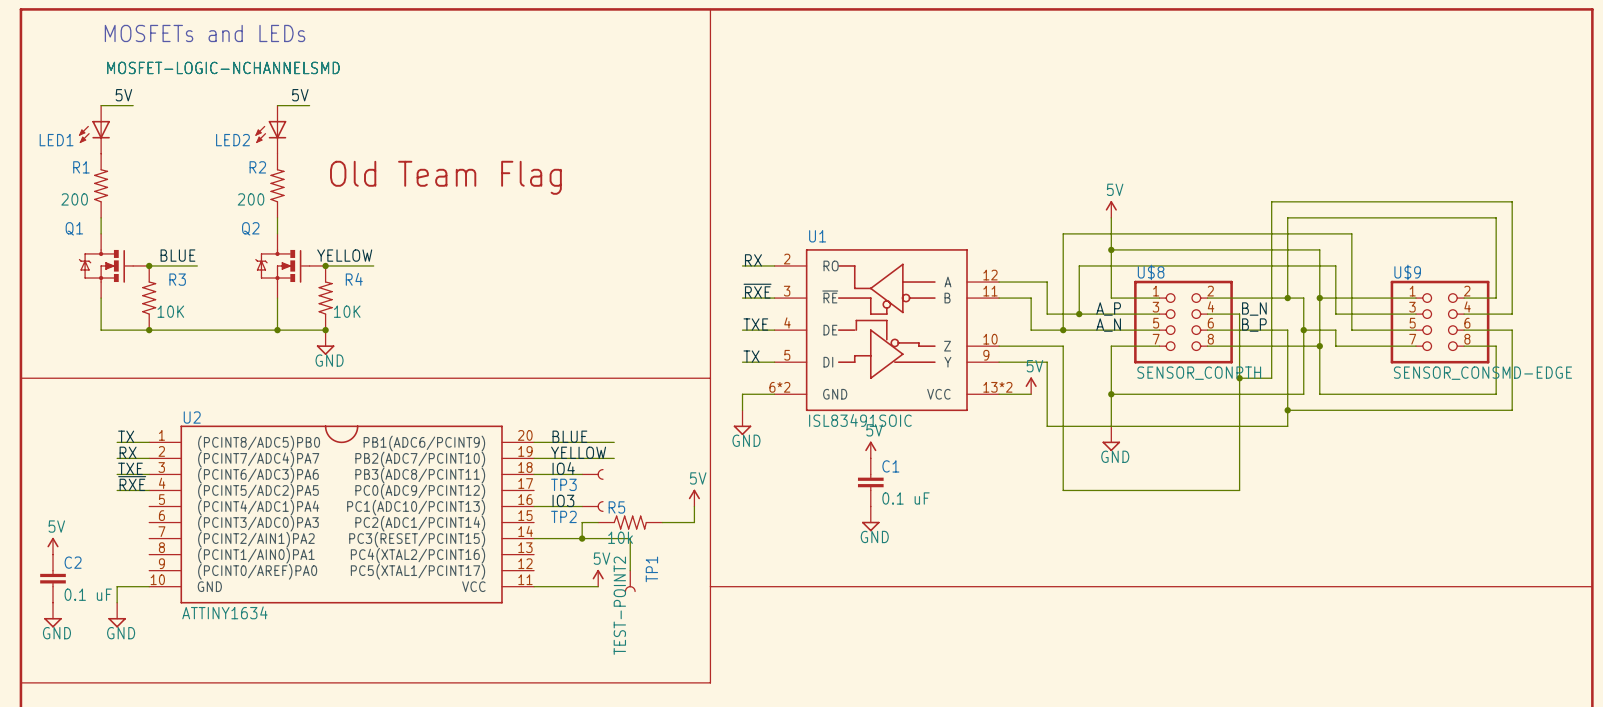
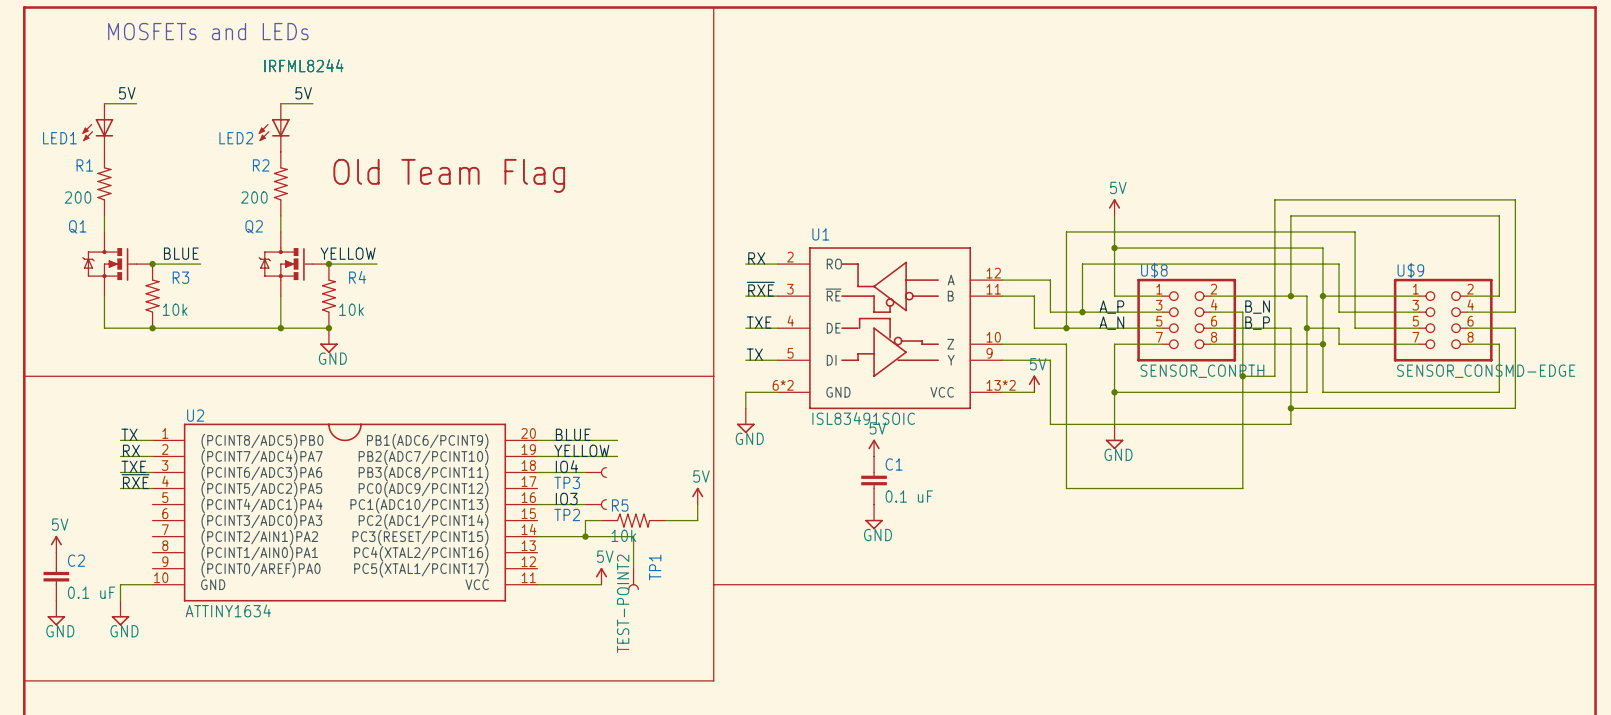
Q1 value: MOSFET-LOGIC-NCHANNELSMD (223, 67) -> IRFML8244 (303, 65)
Q2 value: MOSFET-LOGIC-NCHANNELSMD (223, 67) -> IRFML8244 (303, 65)
R3 value: 10K (170, 311) -> 10k (175, 309)
R4 value: 10K (347, 311) -> 10k (351, 309)

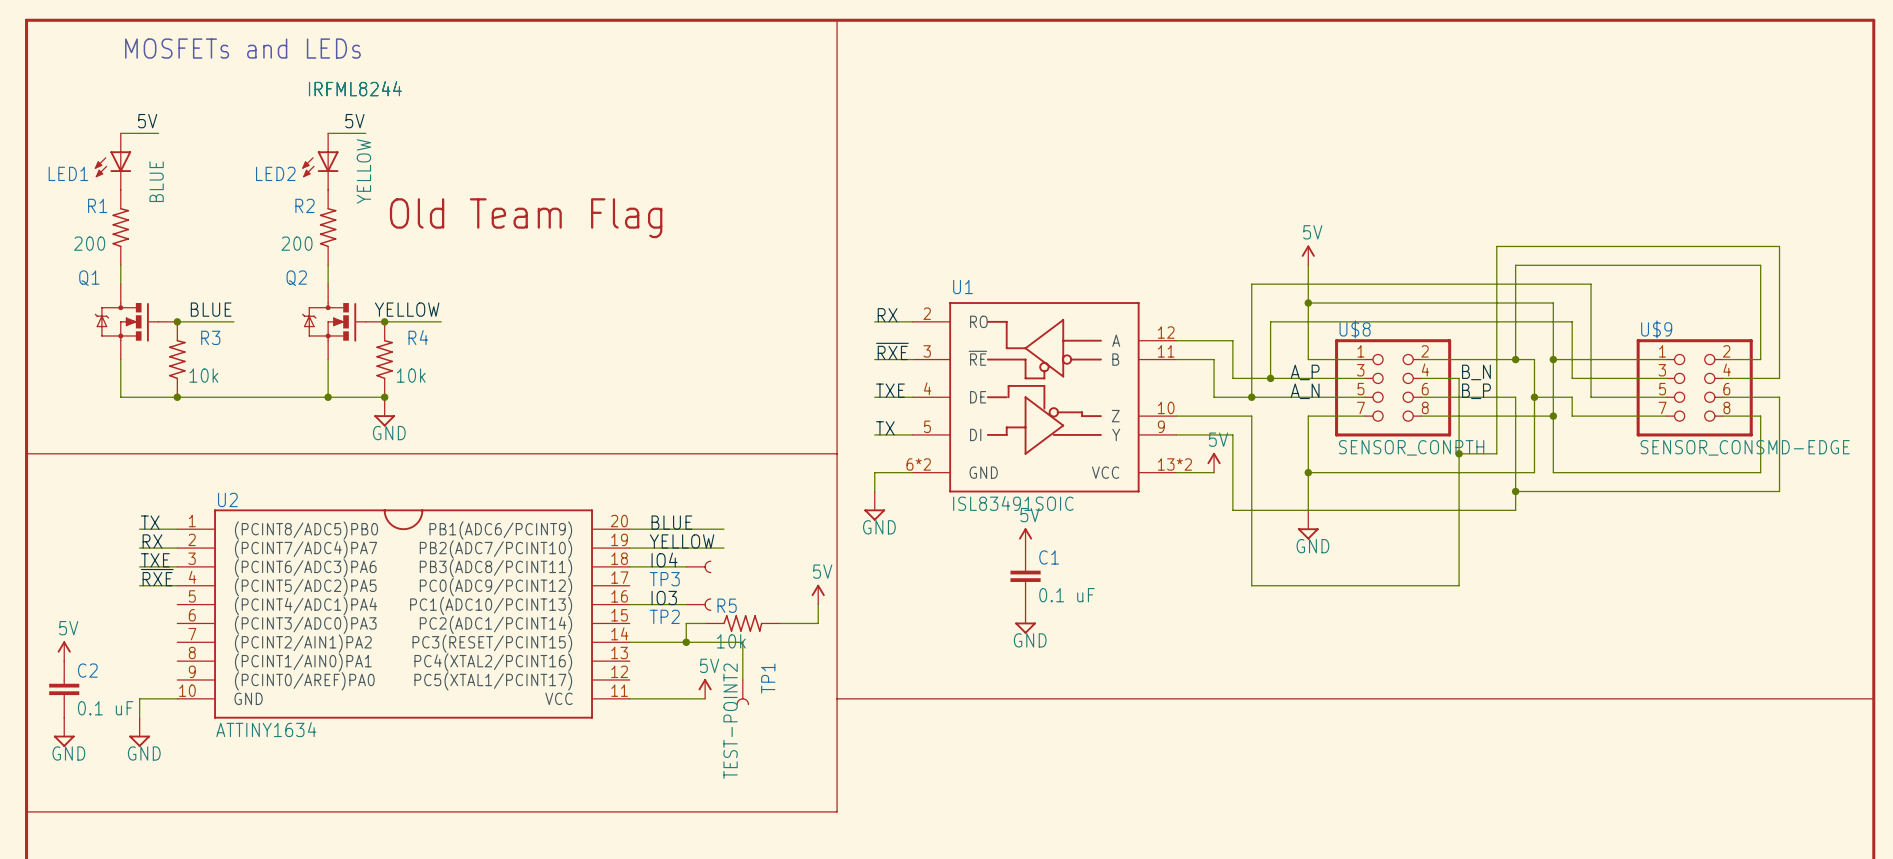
LED2 value: none -> YELLOW (363, 171)
LED1 value: none -> BLUE (156, 181)

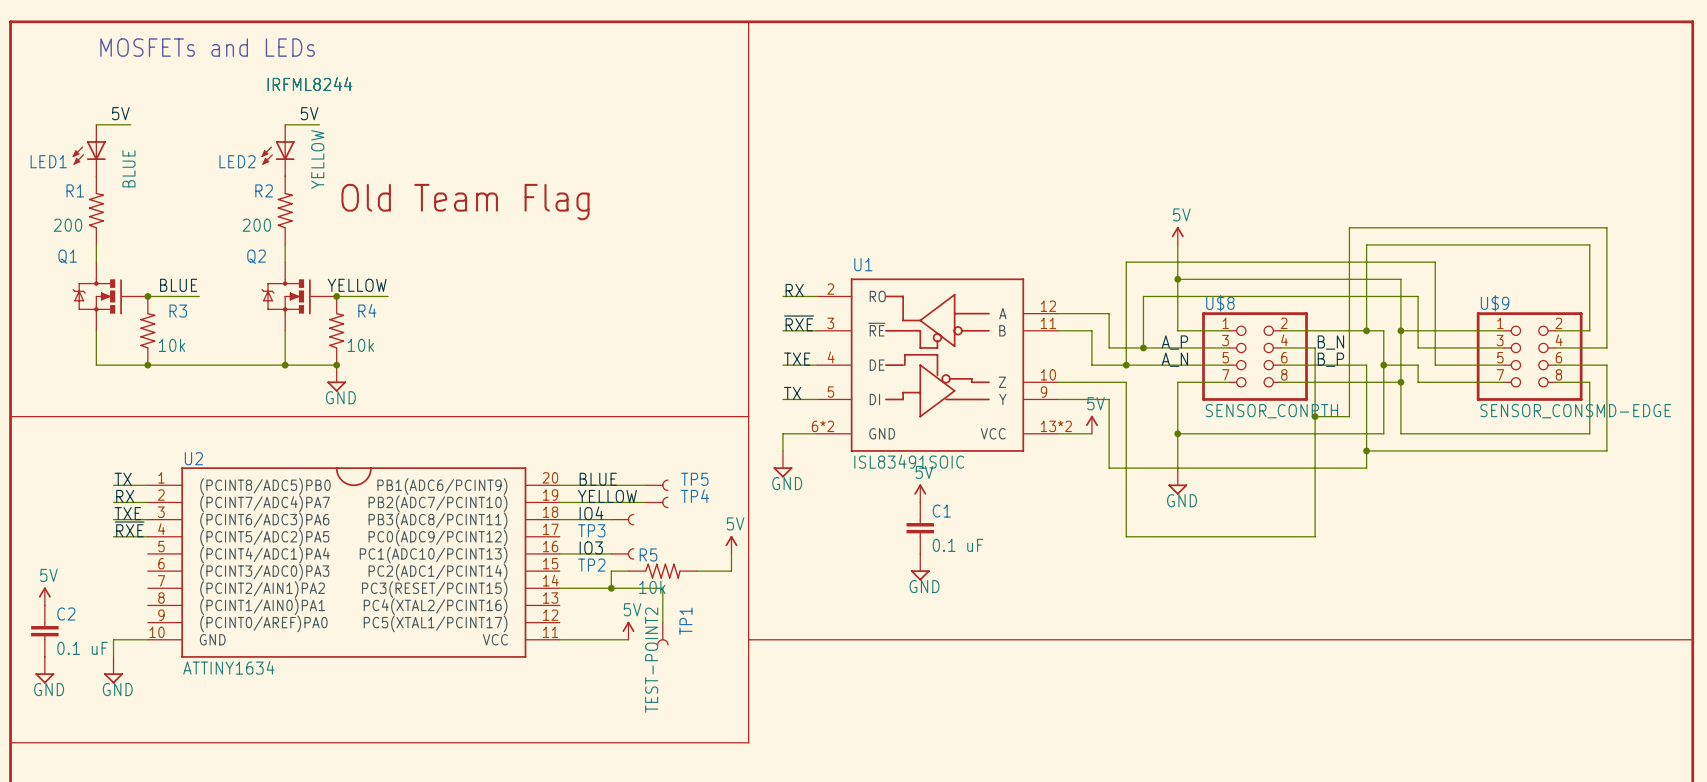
text: none -> TP5 (694, 479)
part: none -> (656, 485)
text: none -> TP4 (695, 496)
part: none -> (656, 502)

